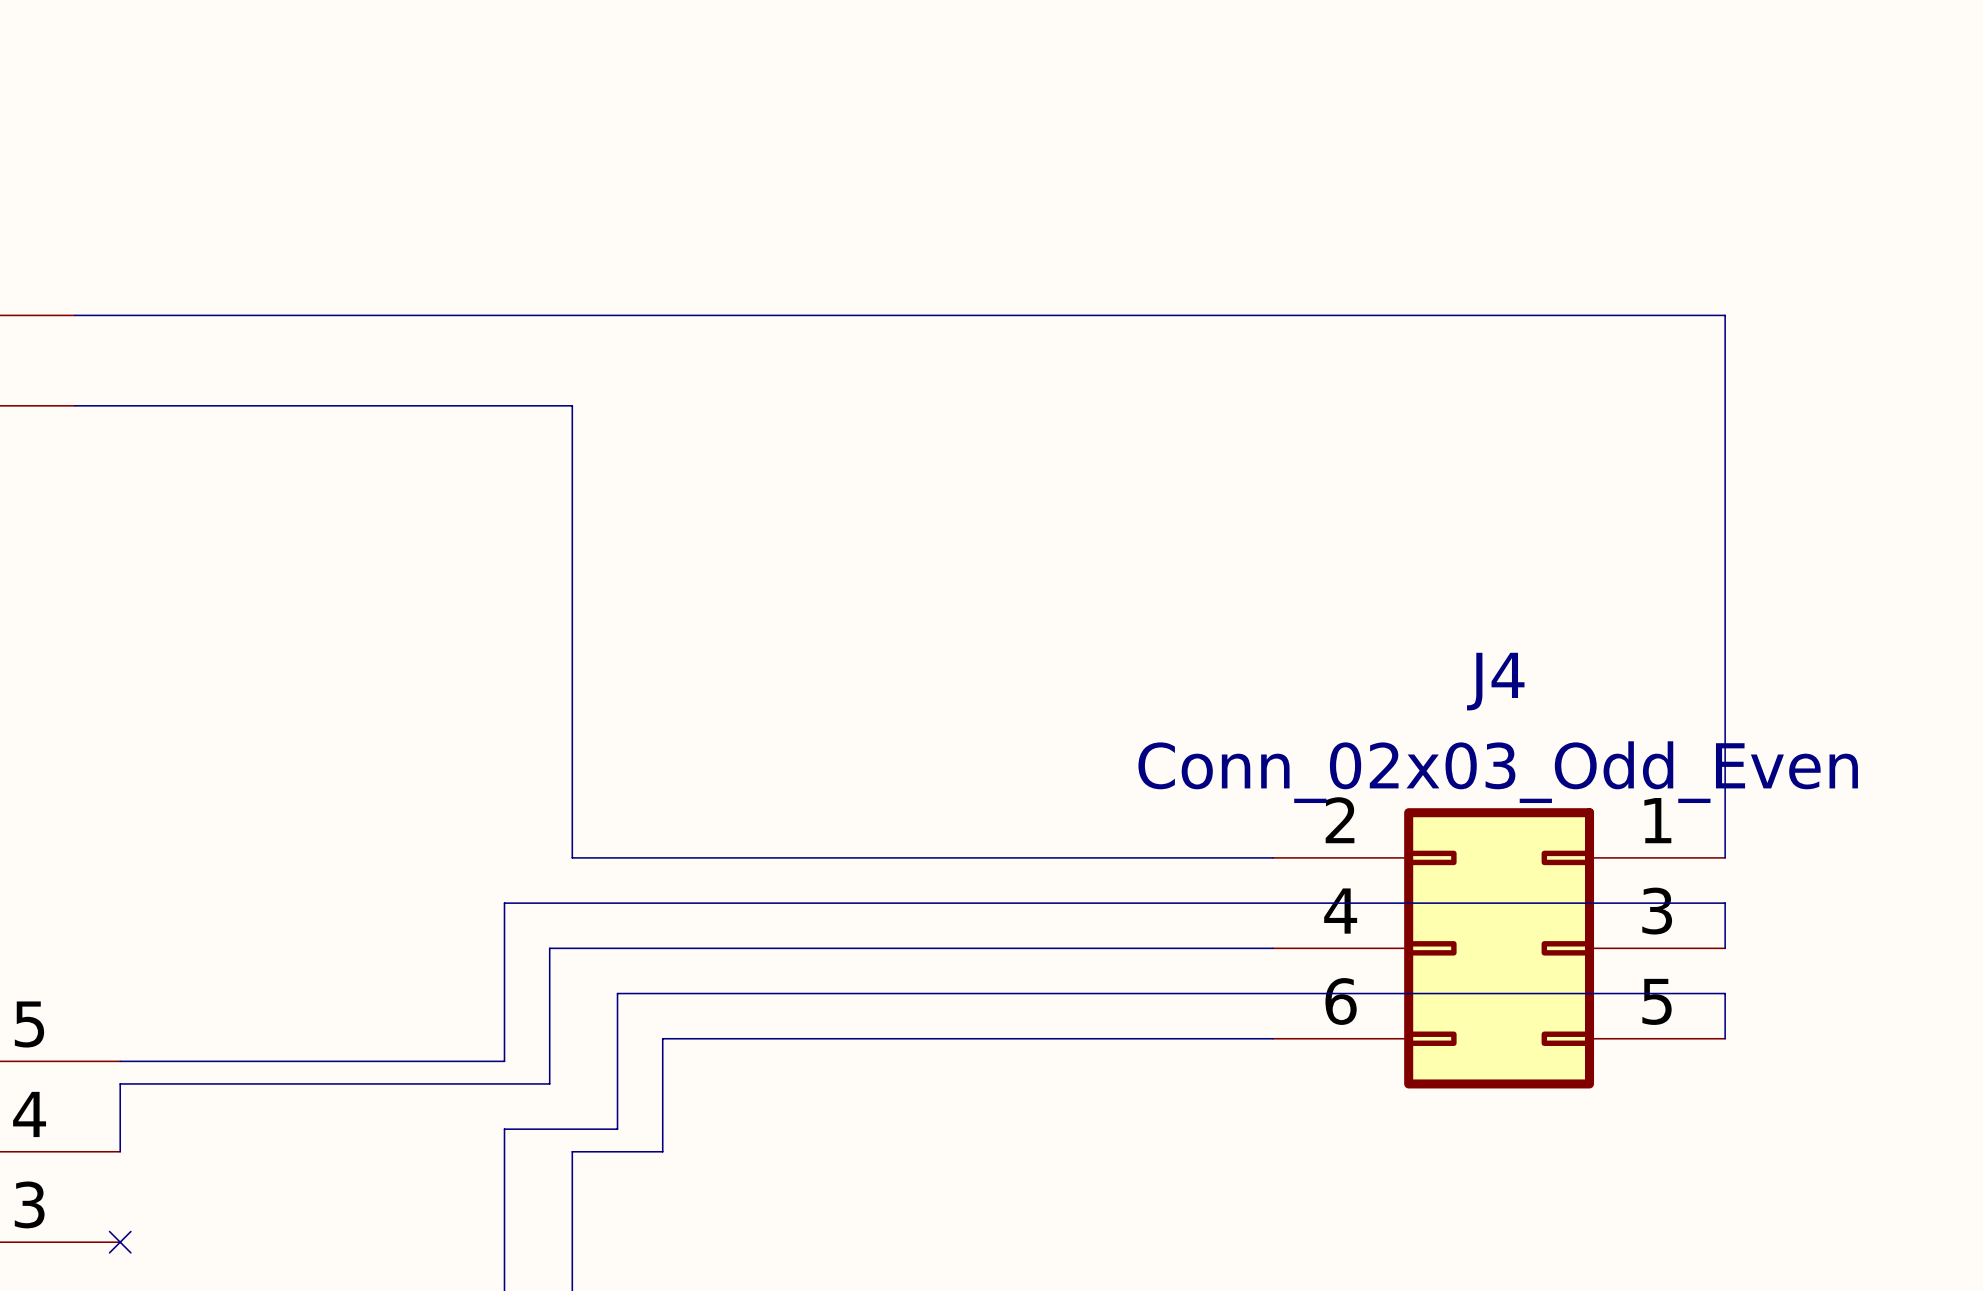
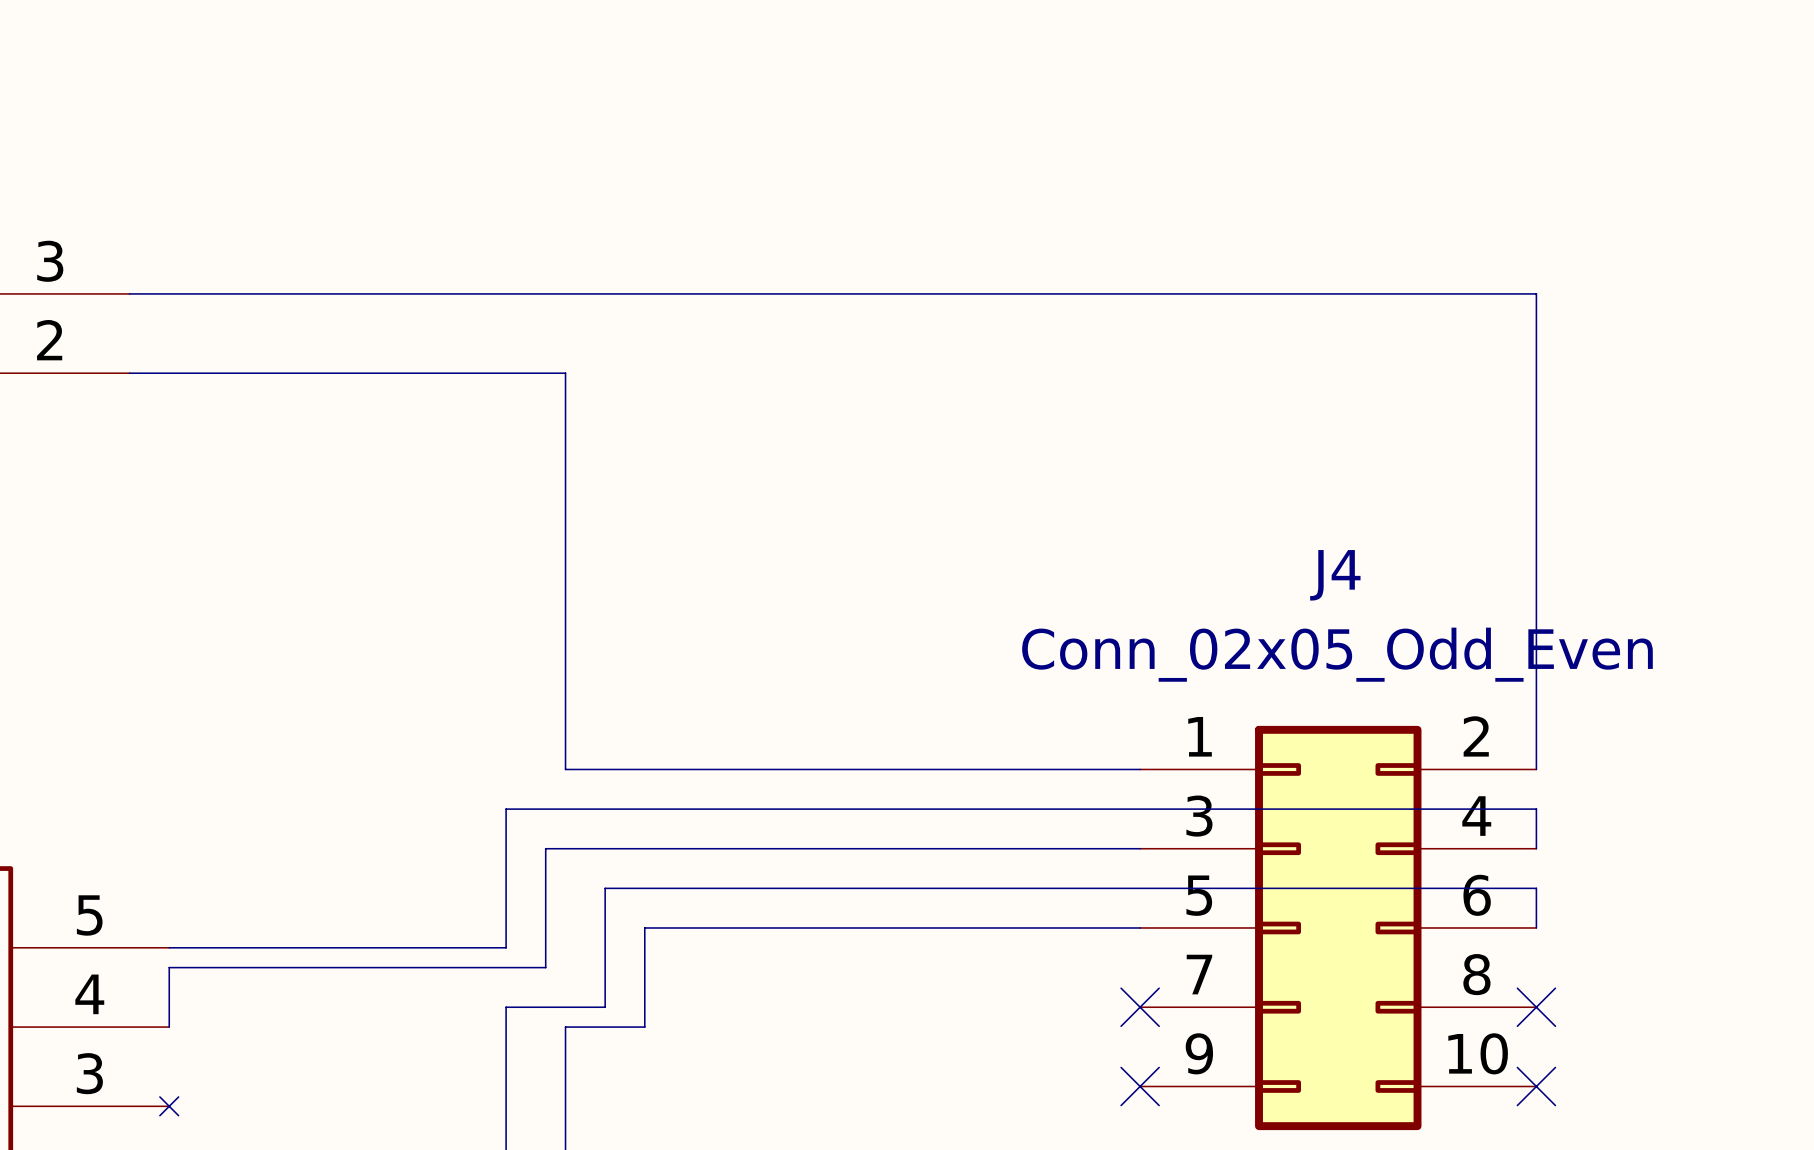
wire: (1679, 315) (1725, 315) (1725, 857) -> (1536, 293) (1536, 769)
J4 name position: J4 (1495, 681) -> J4 (1335, 575)
J4 value: Conn_02x03_Odd_Even (1498, 772) -> Conn_02x05_Odd_Even (1337, 654)
J4 symbol: [1273, 808, 1726, 1089] -> [1140, 725, 1537, 1131]
wire: (1679, 903) (1725, 903) (1725, 948) -> (1536, 809) (1536, 848)
wire: (1679, 993) (1725, 993) (1725, 1038) -> (1536, 888) (1536, 927)
no-connect mark: none -> (1140, 1007)
no-connect mark: none -> (1536, 1007)
no-connect mark: none -> (1140, 1086)
no-connect mark: none -> (1536, 1086)

